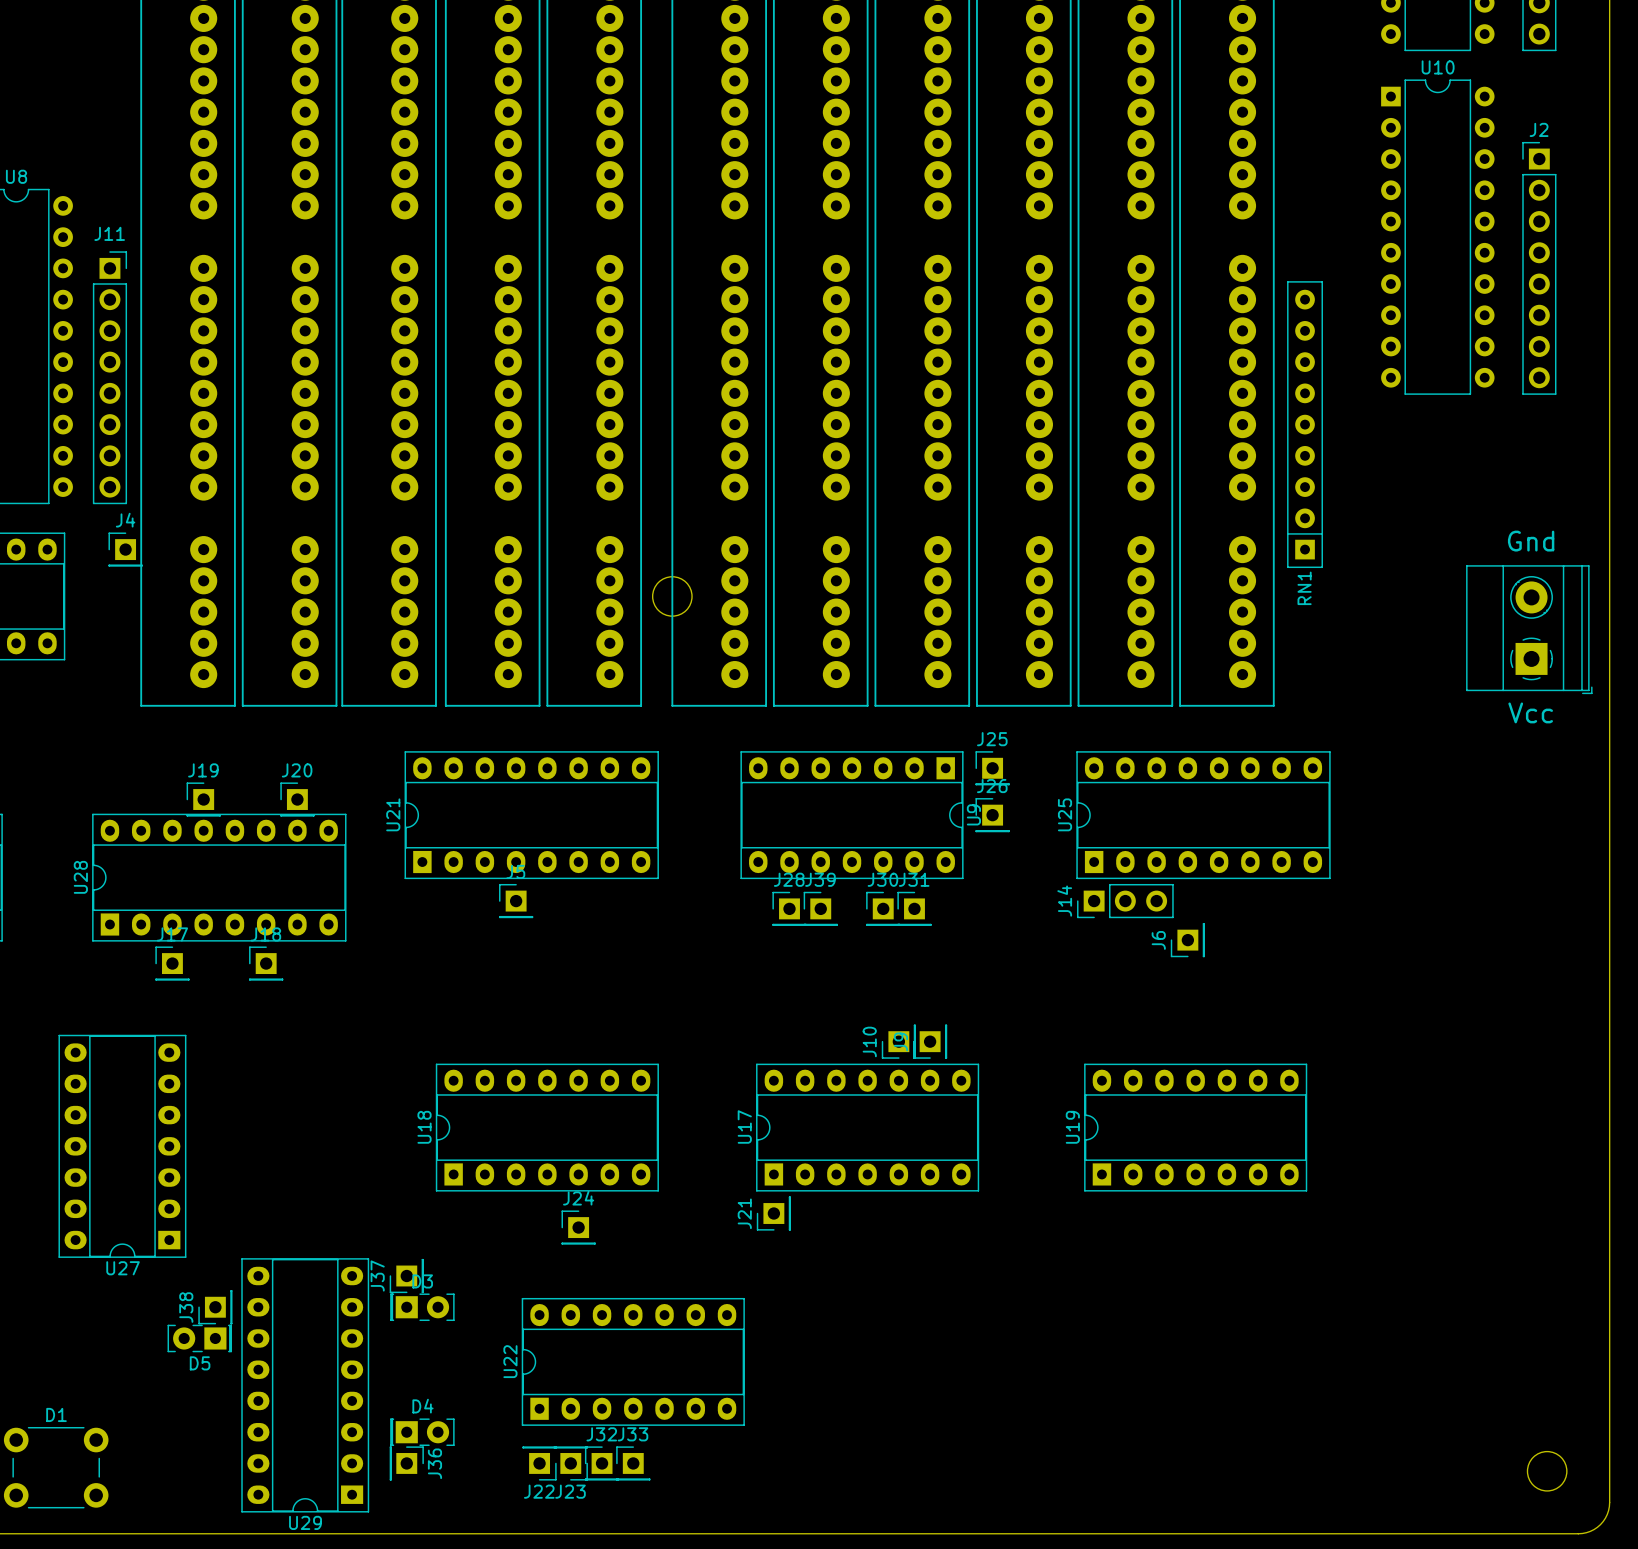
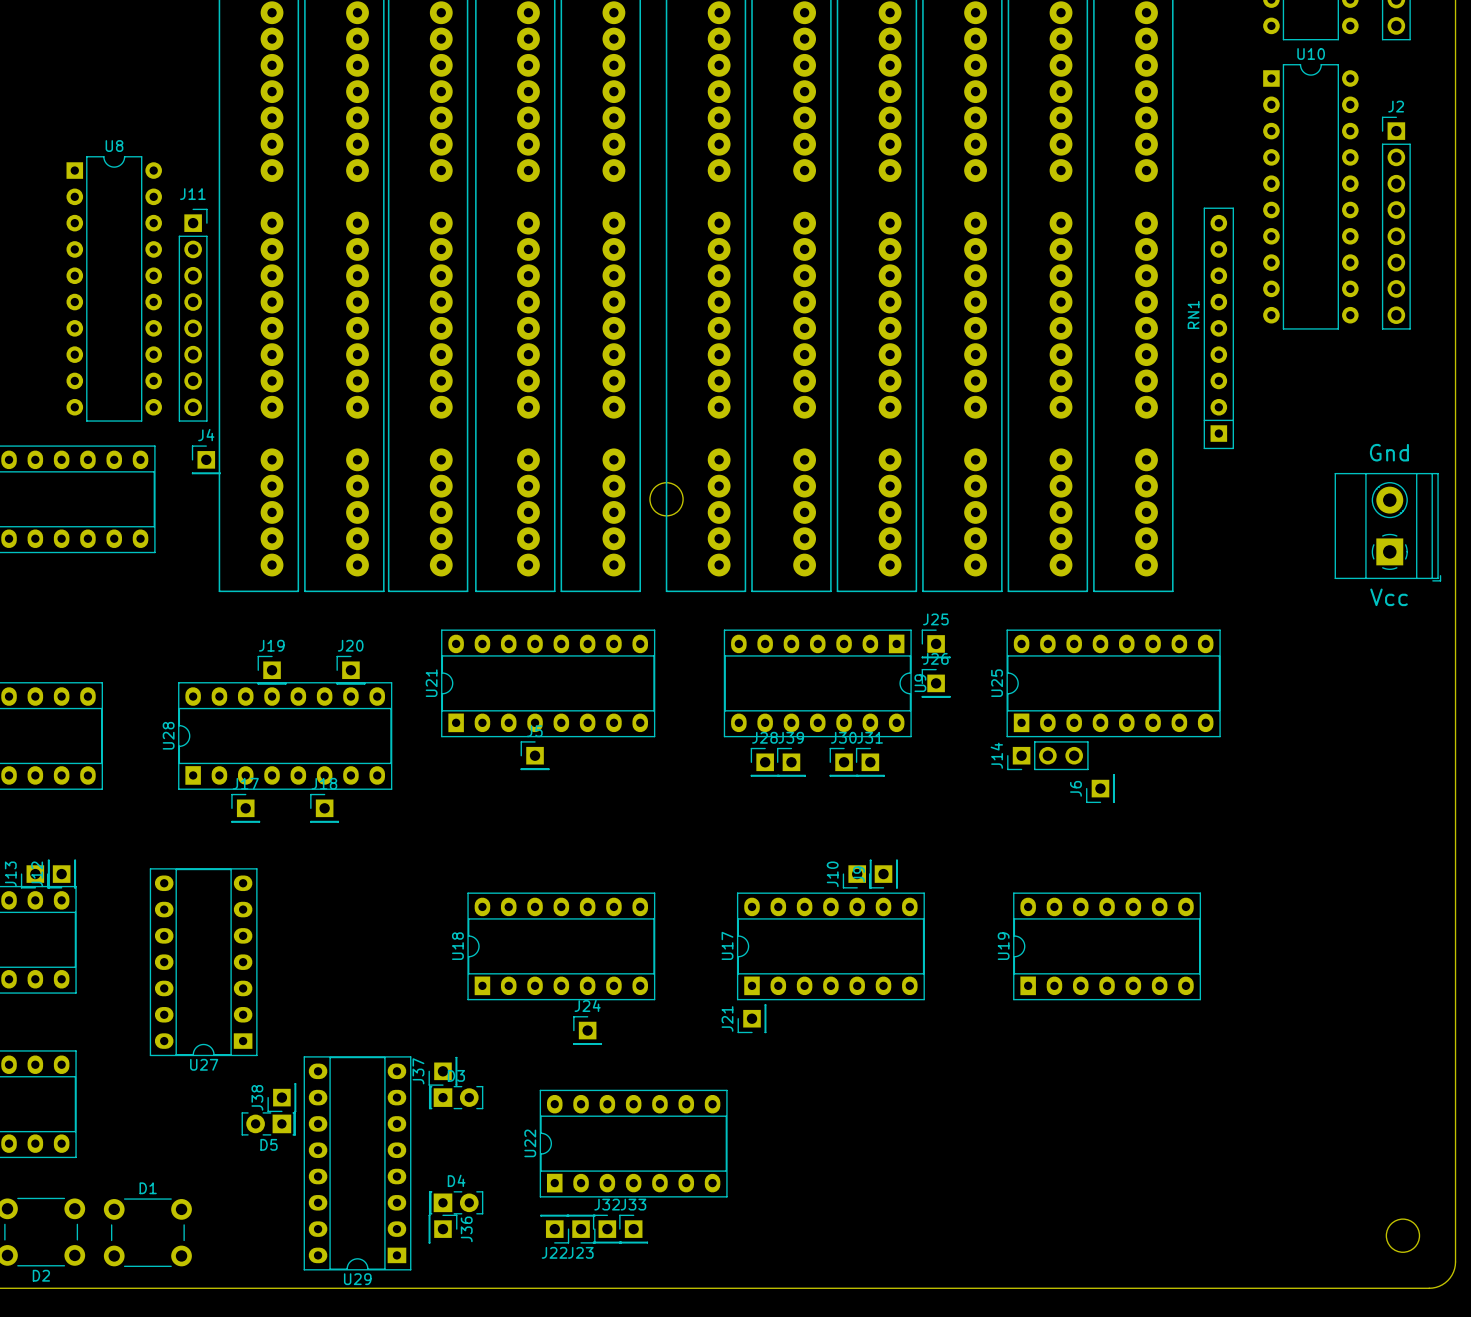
RN1 position: (1305, 424) -> (1218, 328)
RN1 name position: RN1 (1304, 588) -> RN1 (1193, 314)

